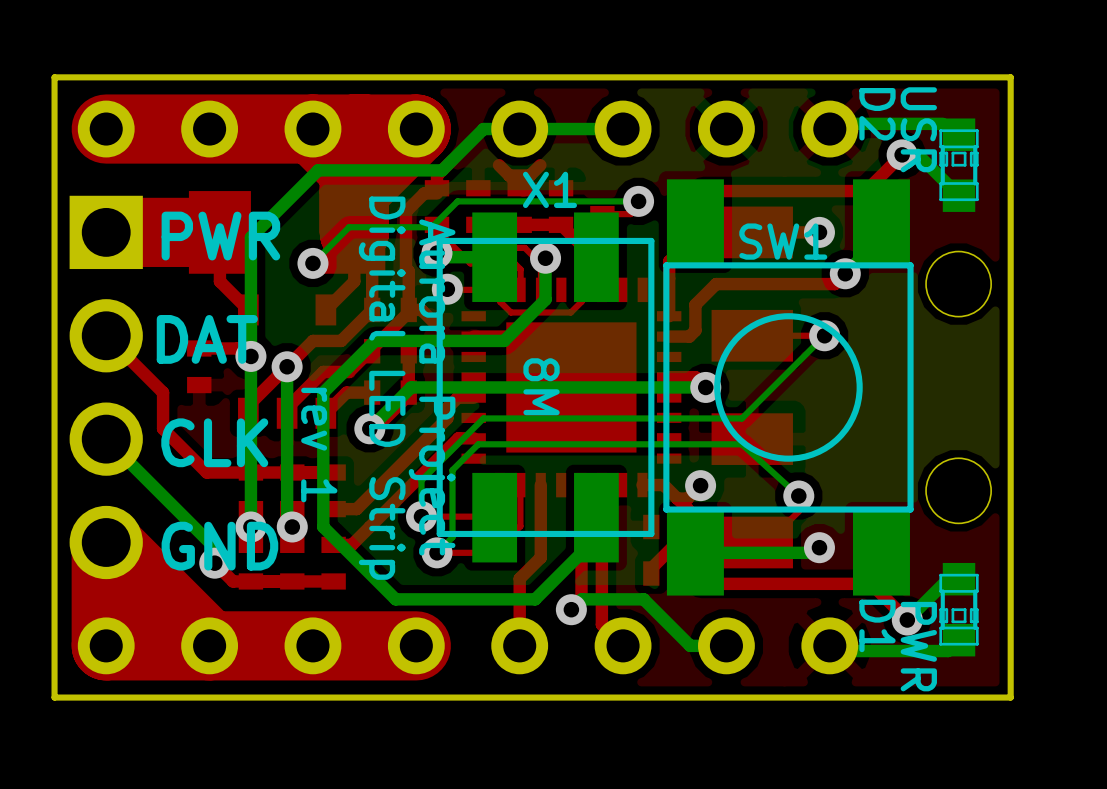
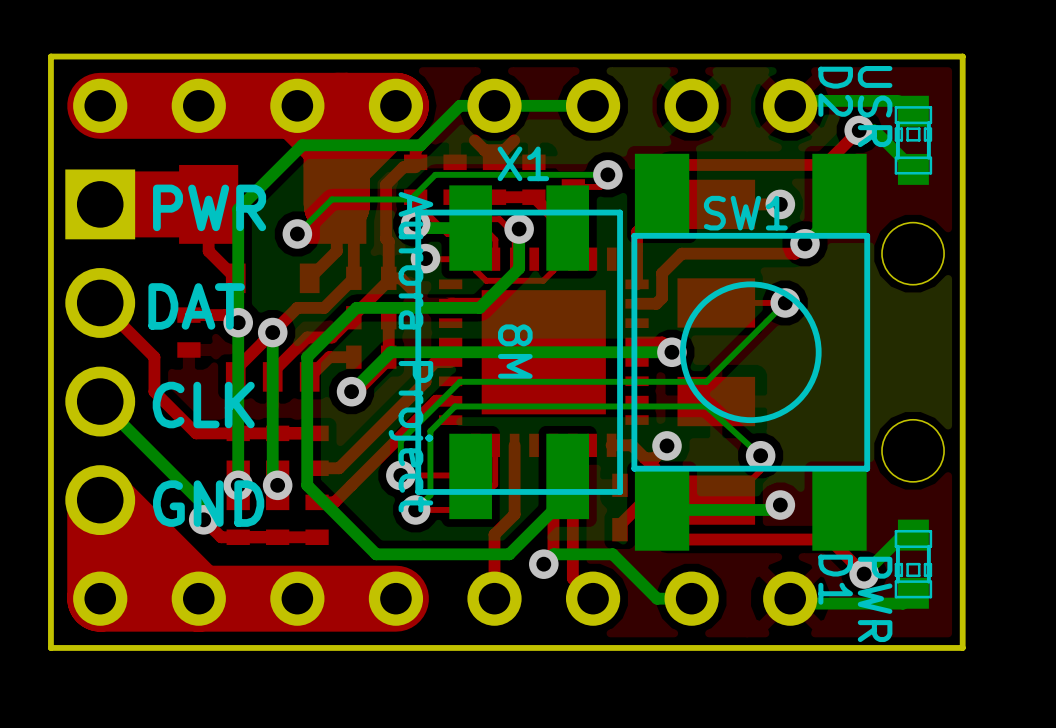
text: Digital LED Strip (382, 388) -> none
text: rev 1 (319, 445) -> none

